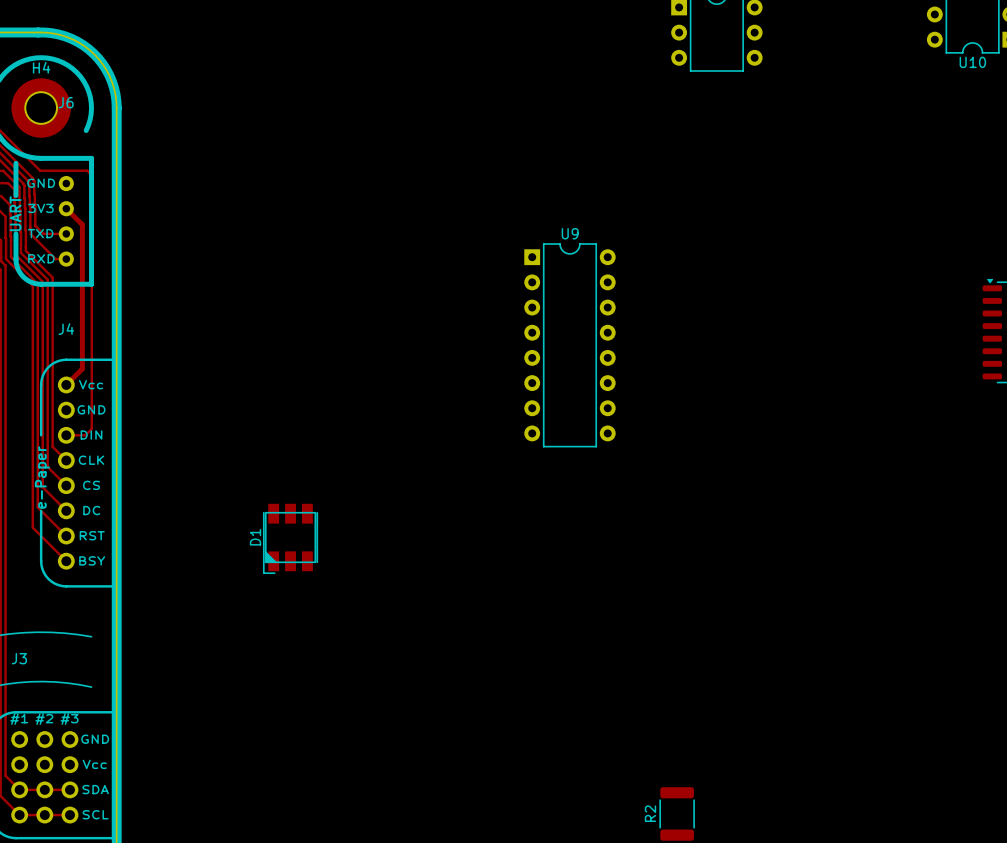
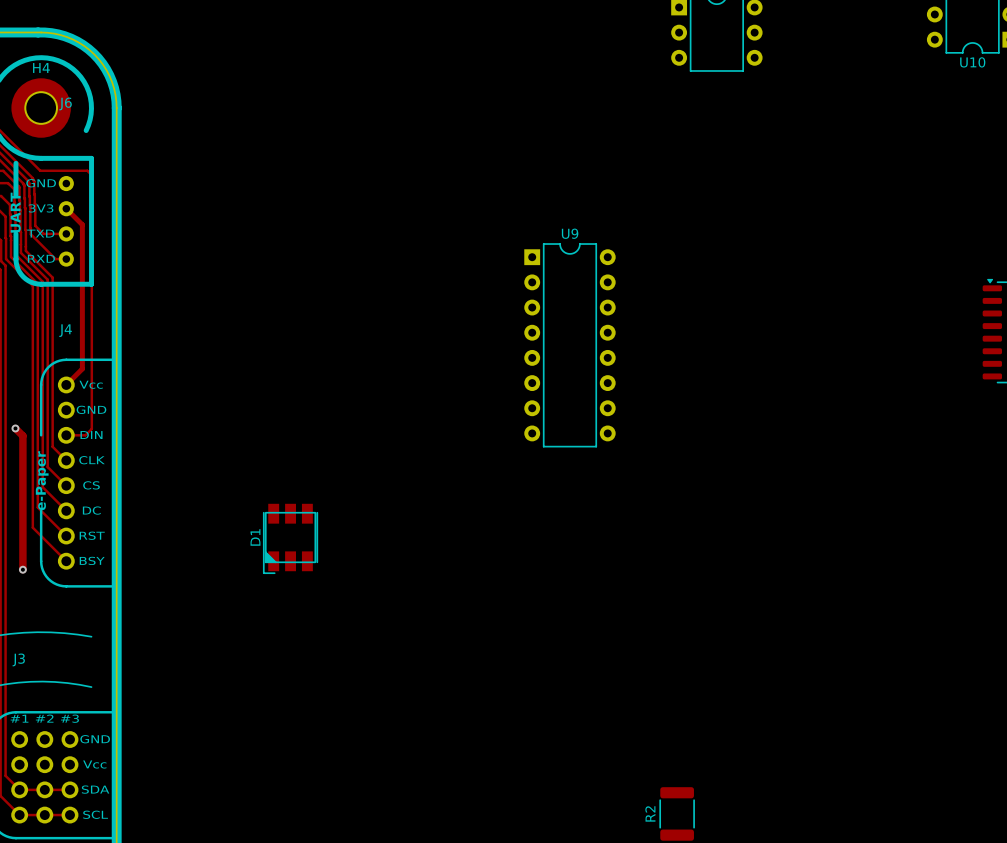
track: none -> (15, 428) (22, 435) (22, 569)
via: none -> (15, 428)
via: none -> (22, 569)

